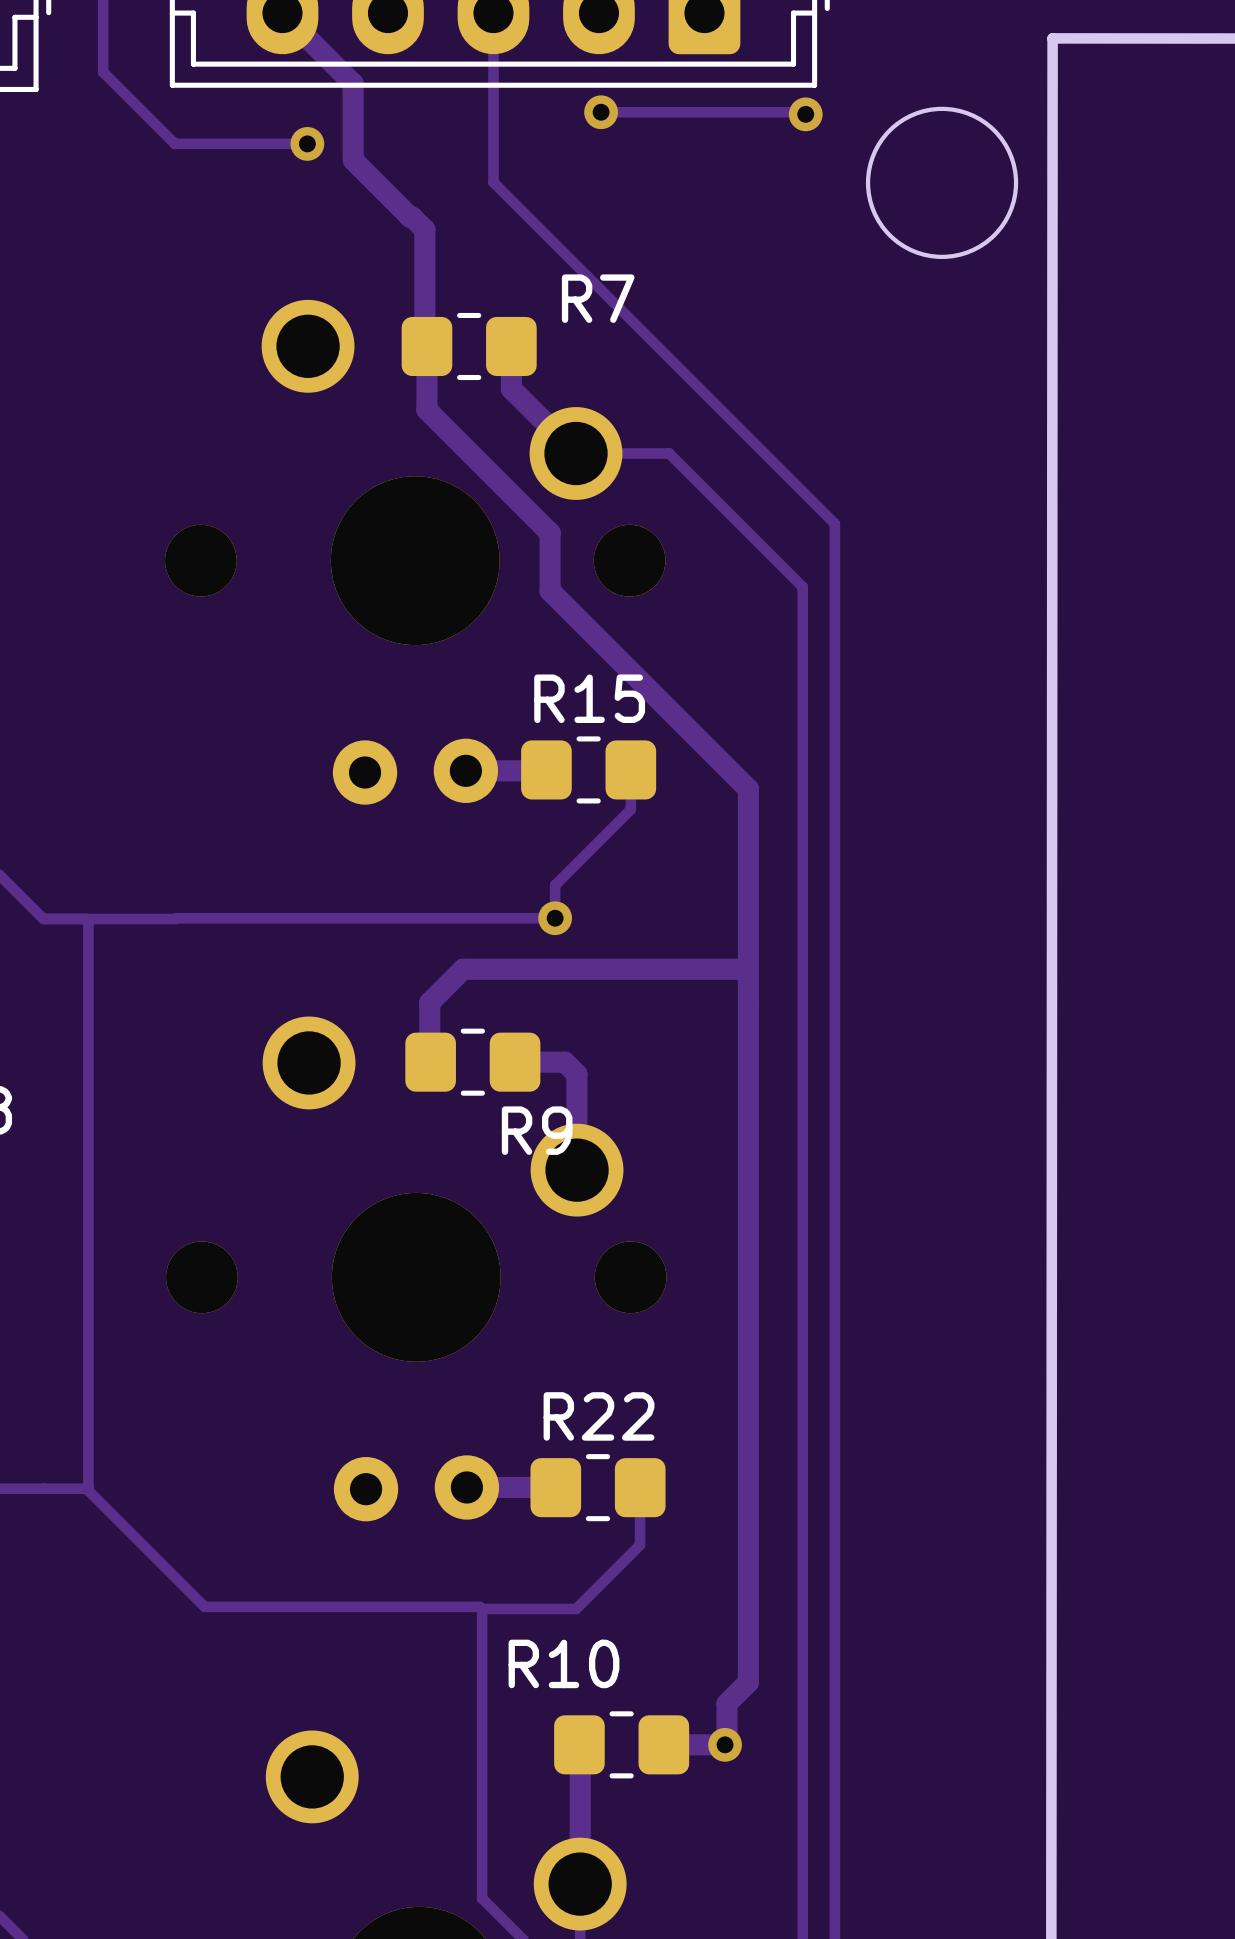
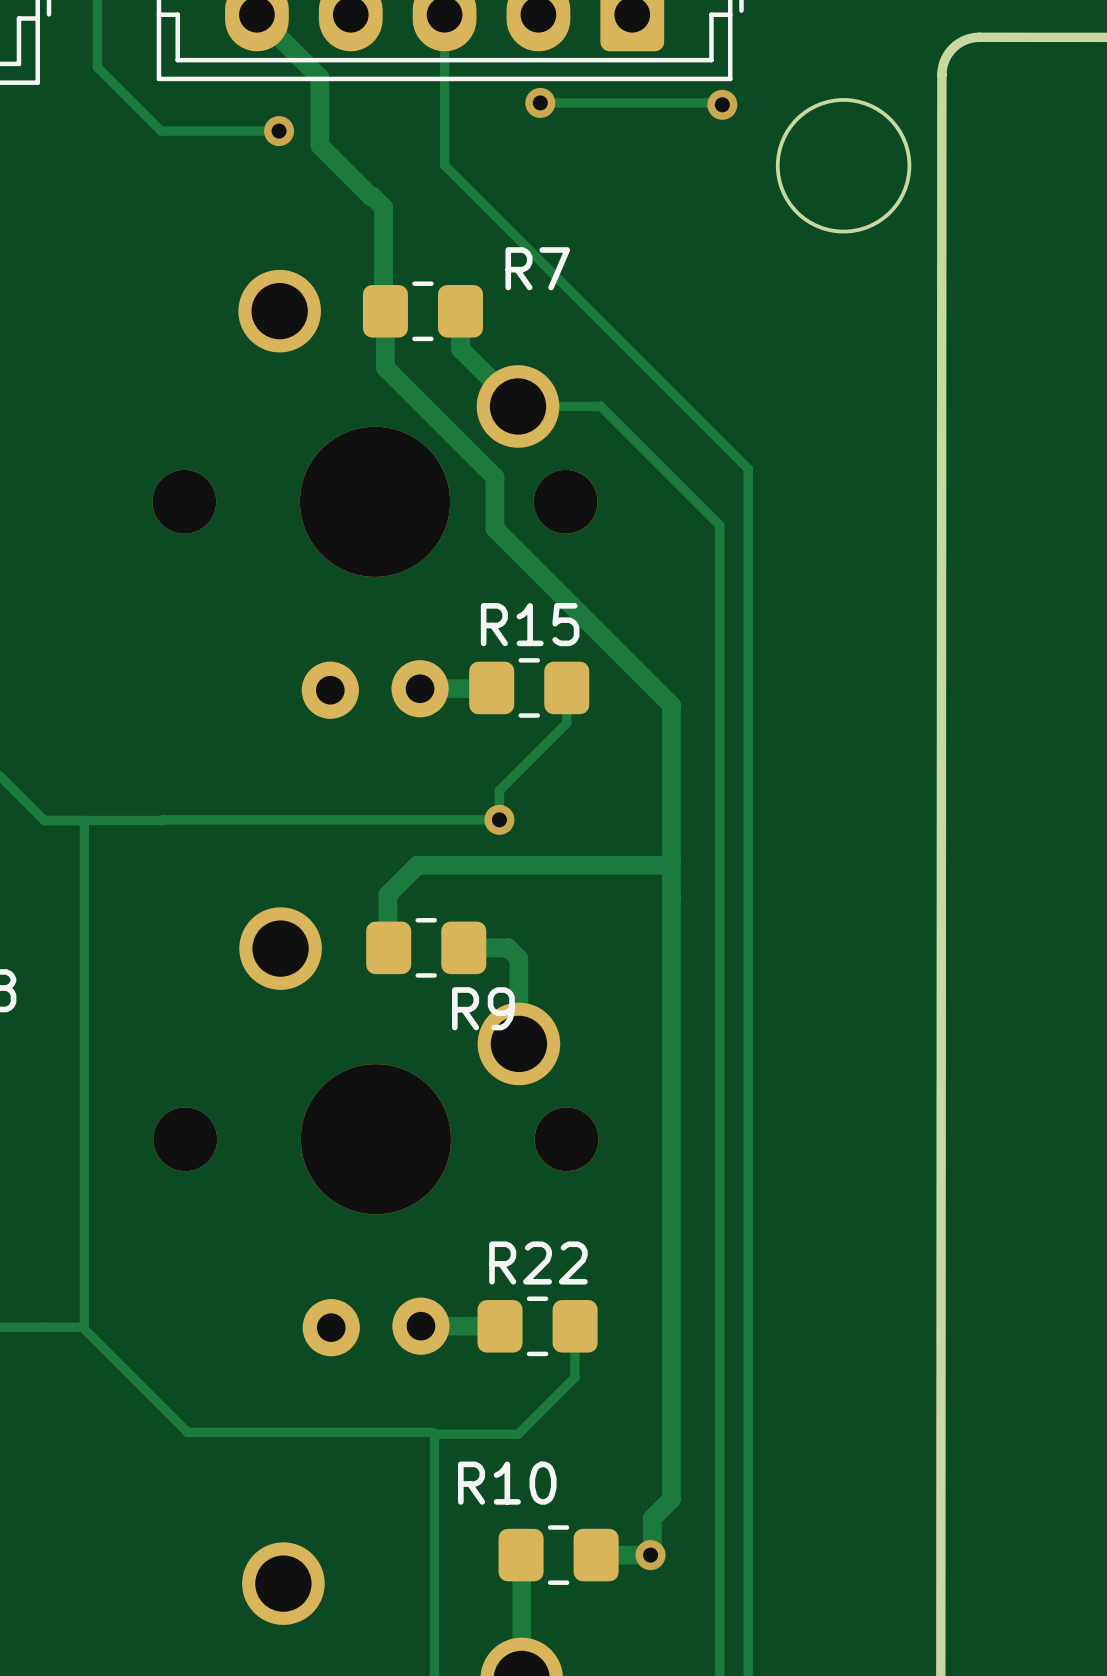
board edge: (1094, 38) (1052, 38) (1052, 80) -> (979, 37) (963, 40) (952, 48) (944, 62) (941, 74)

